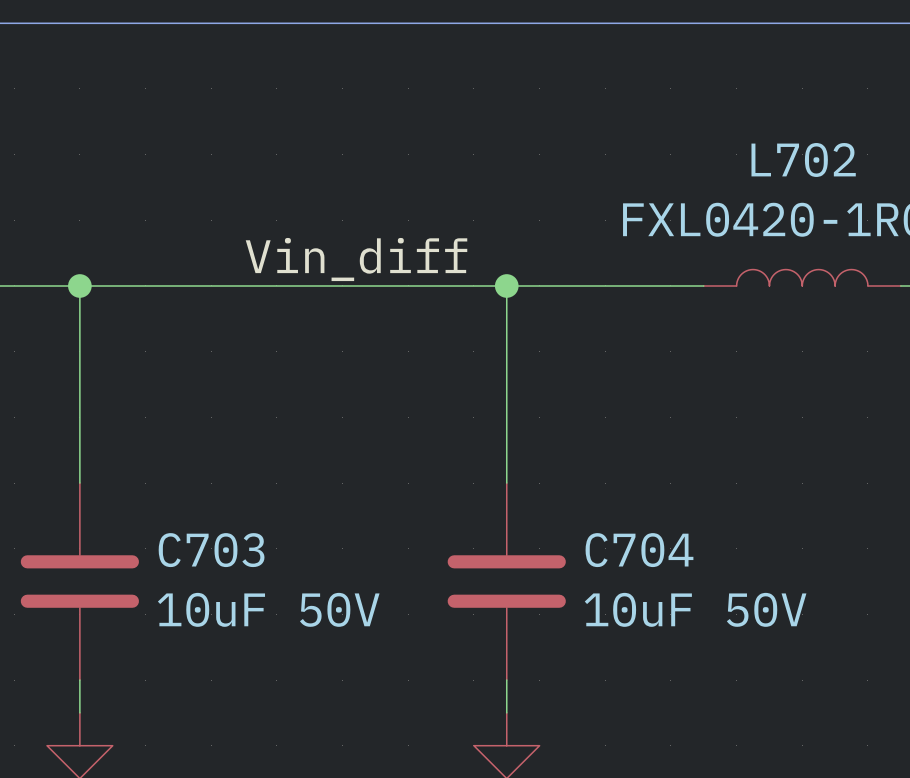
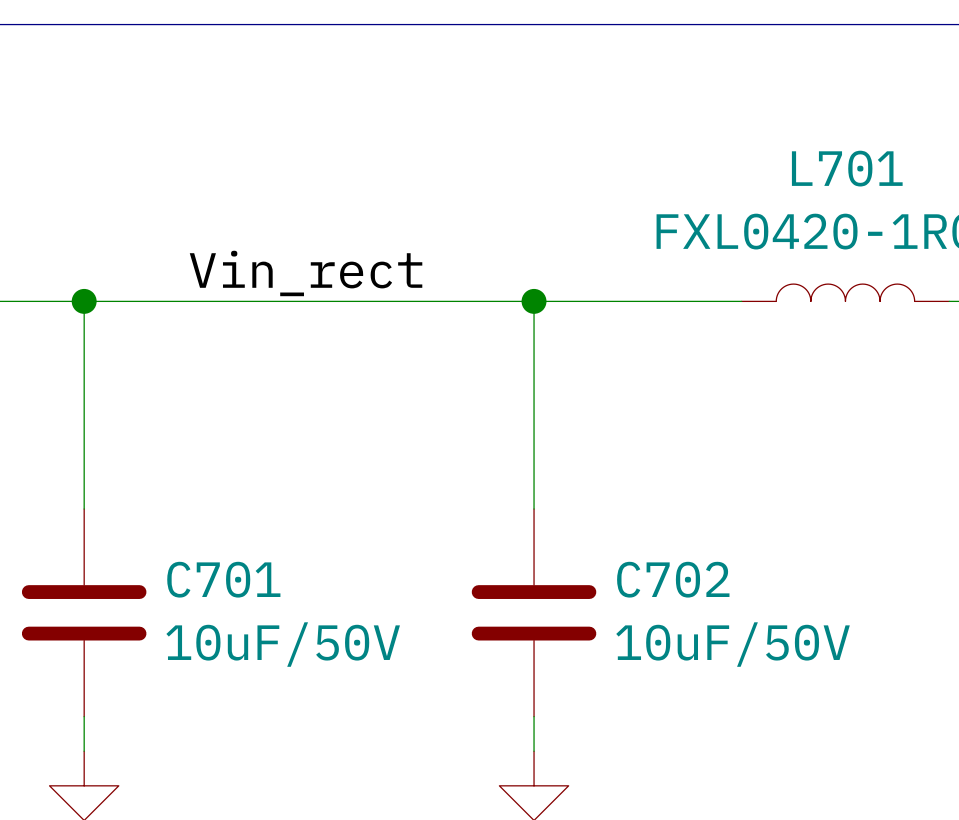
L702 name: L702 (803, 159) -> L701 (847, 168)
label: none -> Vin_rect (306, 273)
label: Vin_diff (356, 259) -> none
C703 name: C703 (211, 550) -> C701 (223, 579)
C704 name: C704 (639, 550) -> C702 (673, 579)
C703 value: 10uF 50V (268, 609) -> 10uF/50V (283, 644)
C704 value: 10uF 50V (695, 609) -> 10uF/50V (733, 644)

